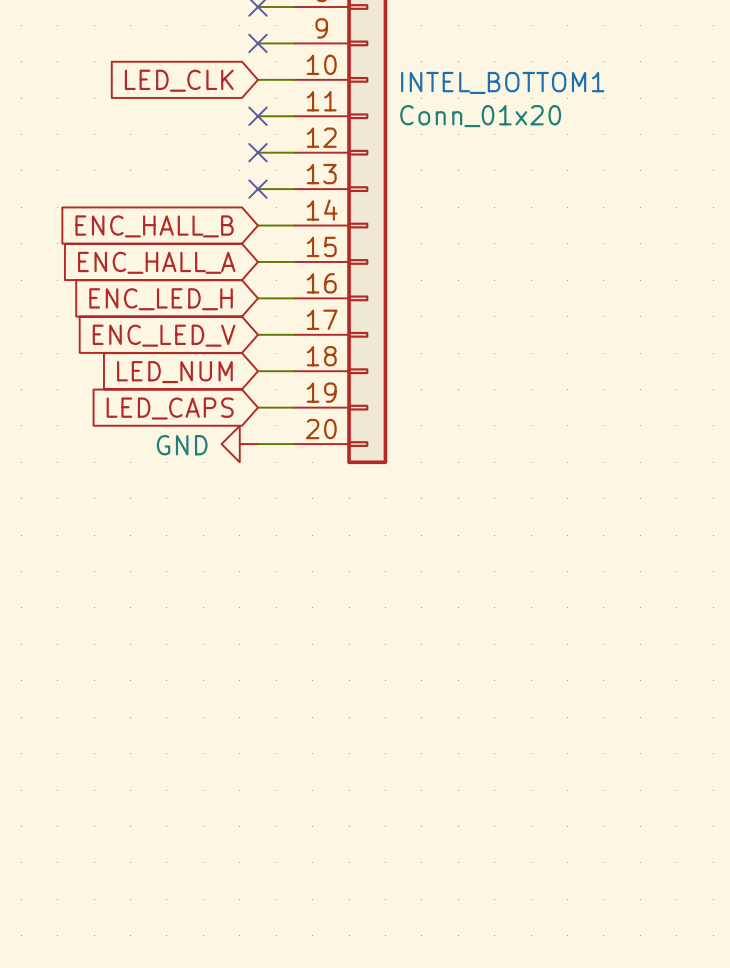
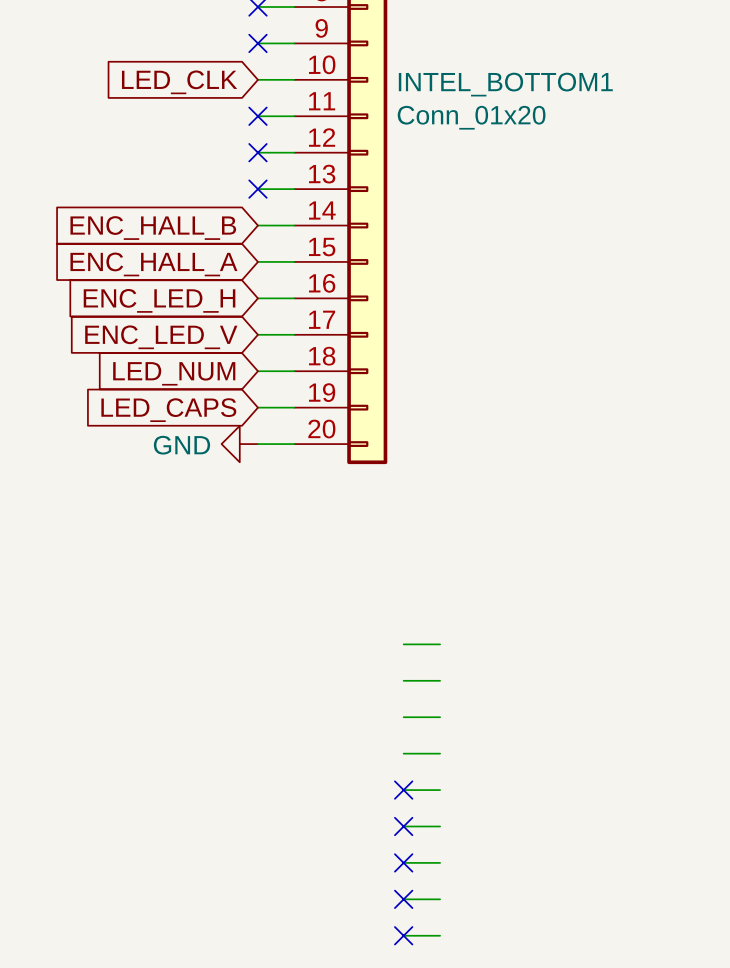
wire: none -> (403, 644) (440, 644)
wire: none -> (403, 680) (440, 680)
wire: none -> (403, 717) (440, 717)
wire: none -> (403, 753) (440, 753)
wire: none -> (403, 790) (440, 790)
no-connect mark: none -> (403, 790)
wire: none -> (403, 826) (440, 826)
no-connect mark: none -> (403, 826)
wire: none -> (403, 862) (440, 862)
no-connect mark: none -> (403, 862)
wire: none -> (403, 899) (440, 899)
no-connect mark: none -> (403, 899)
wire: none -> (403, 935) (440, 935)
no-connect mark: none -> (403, 935)

